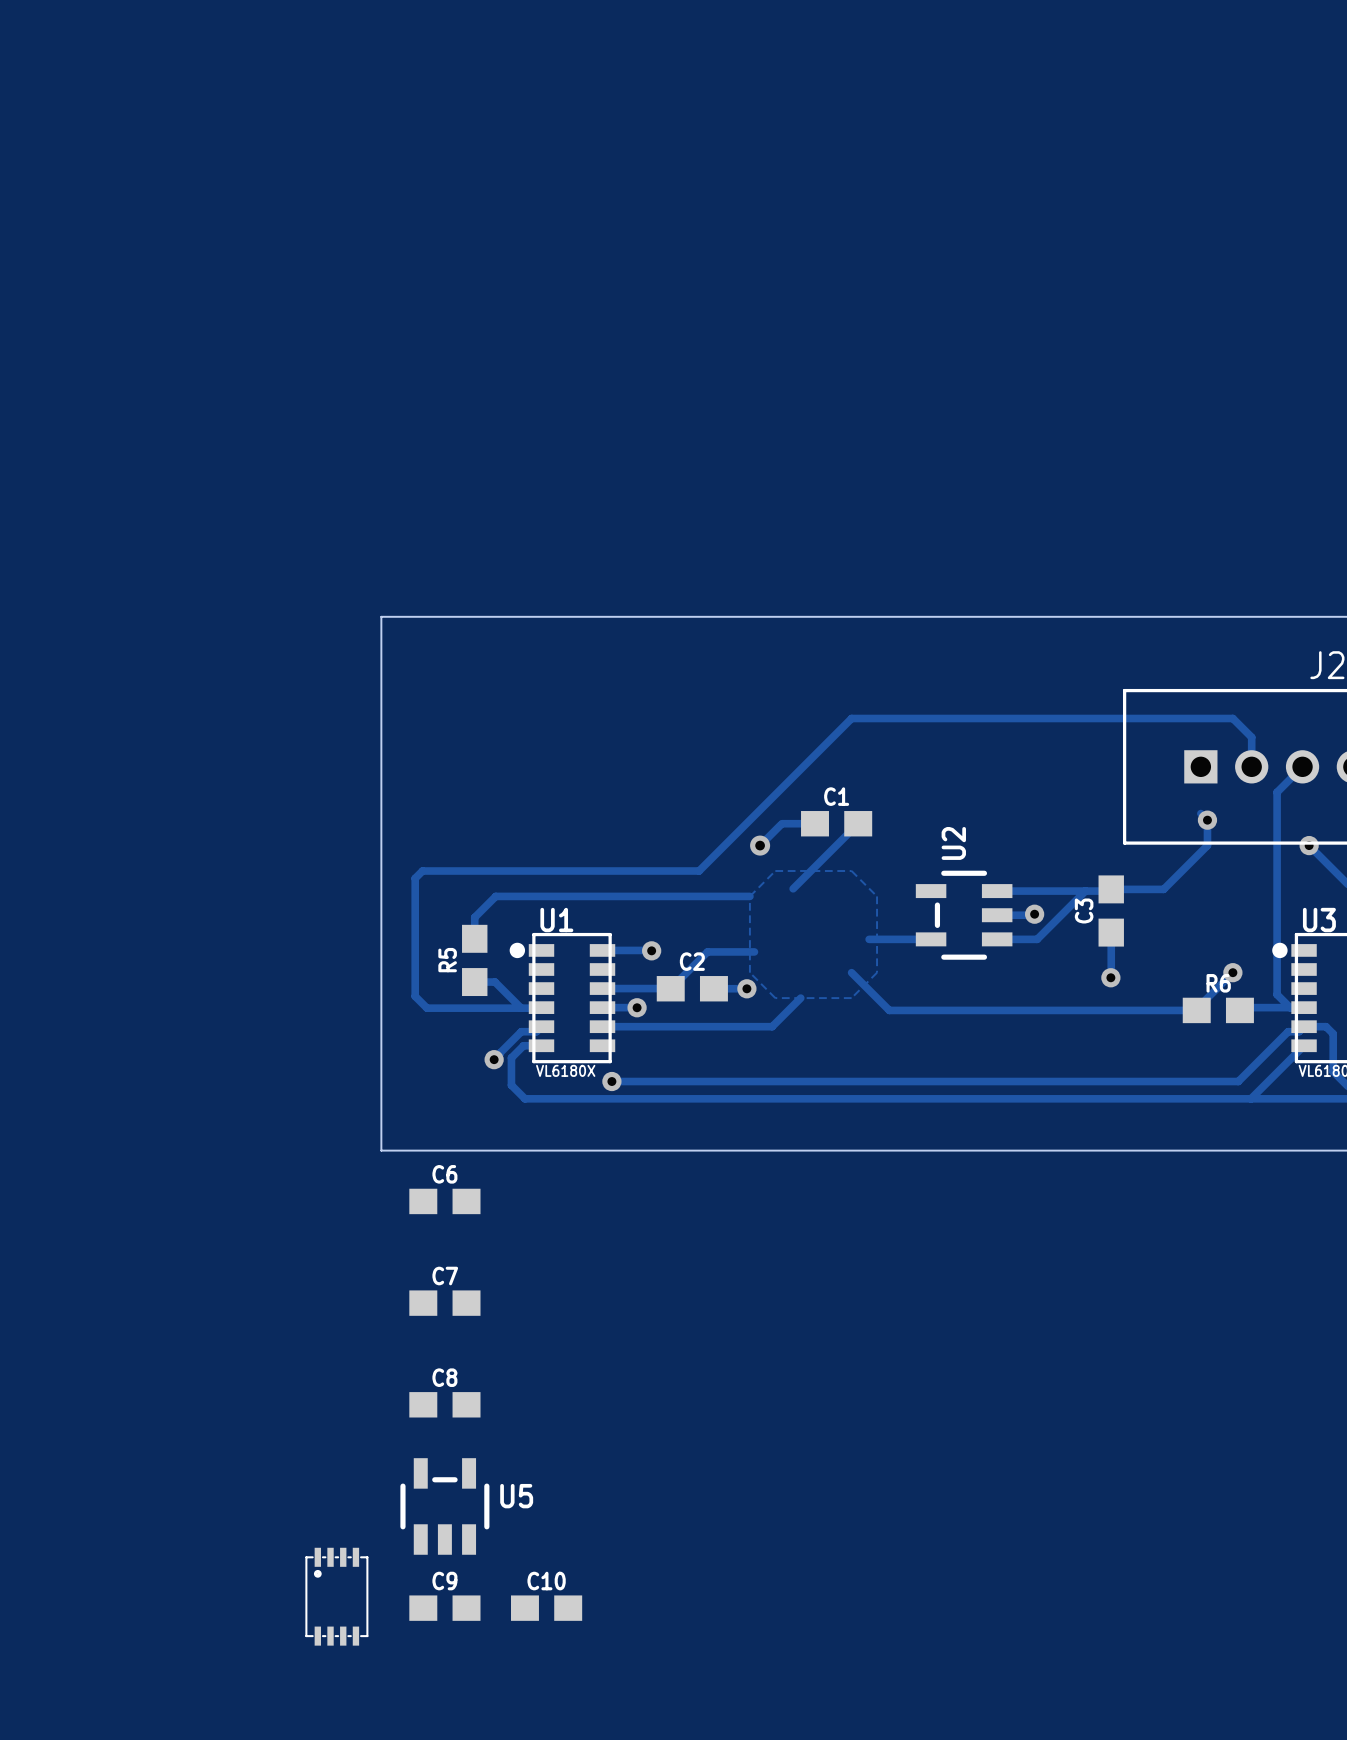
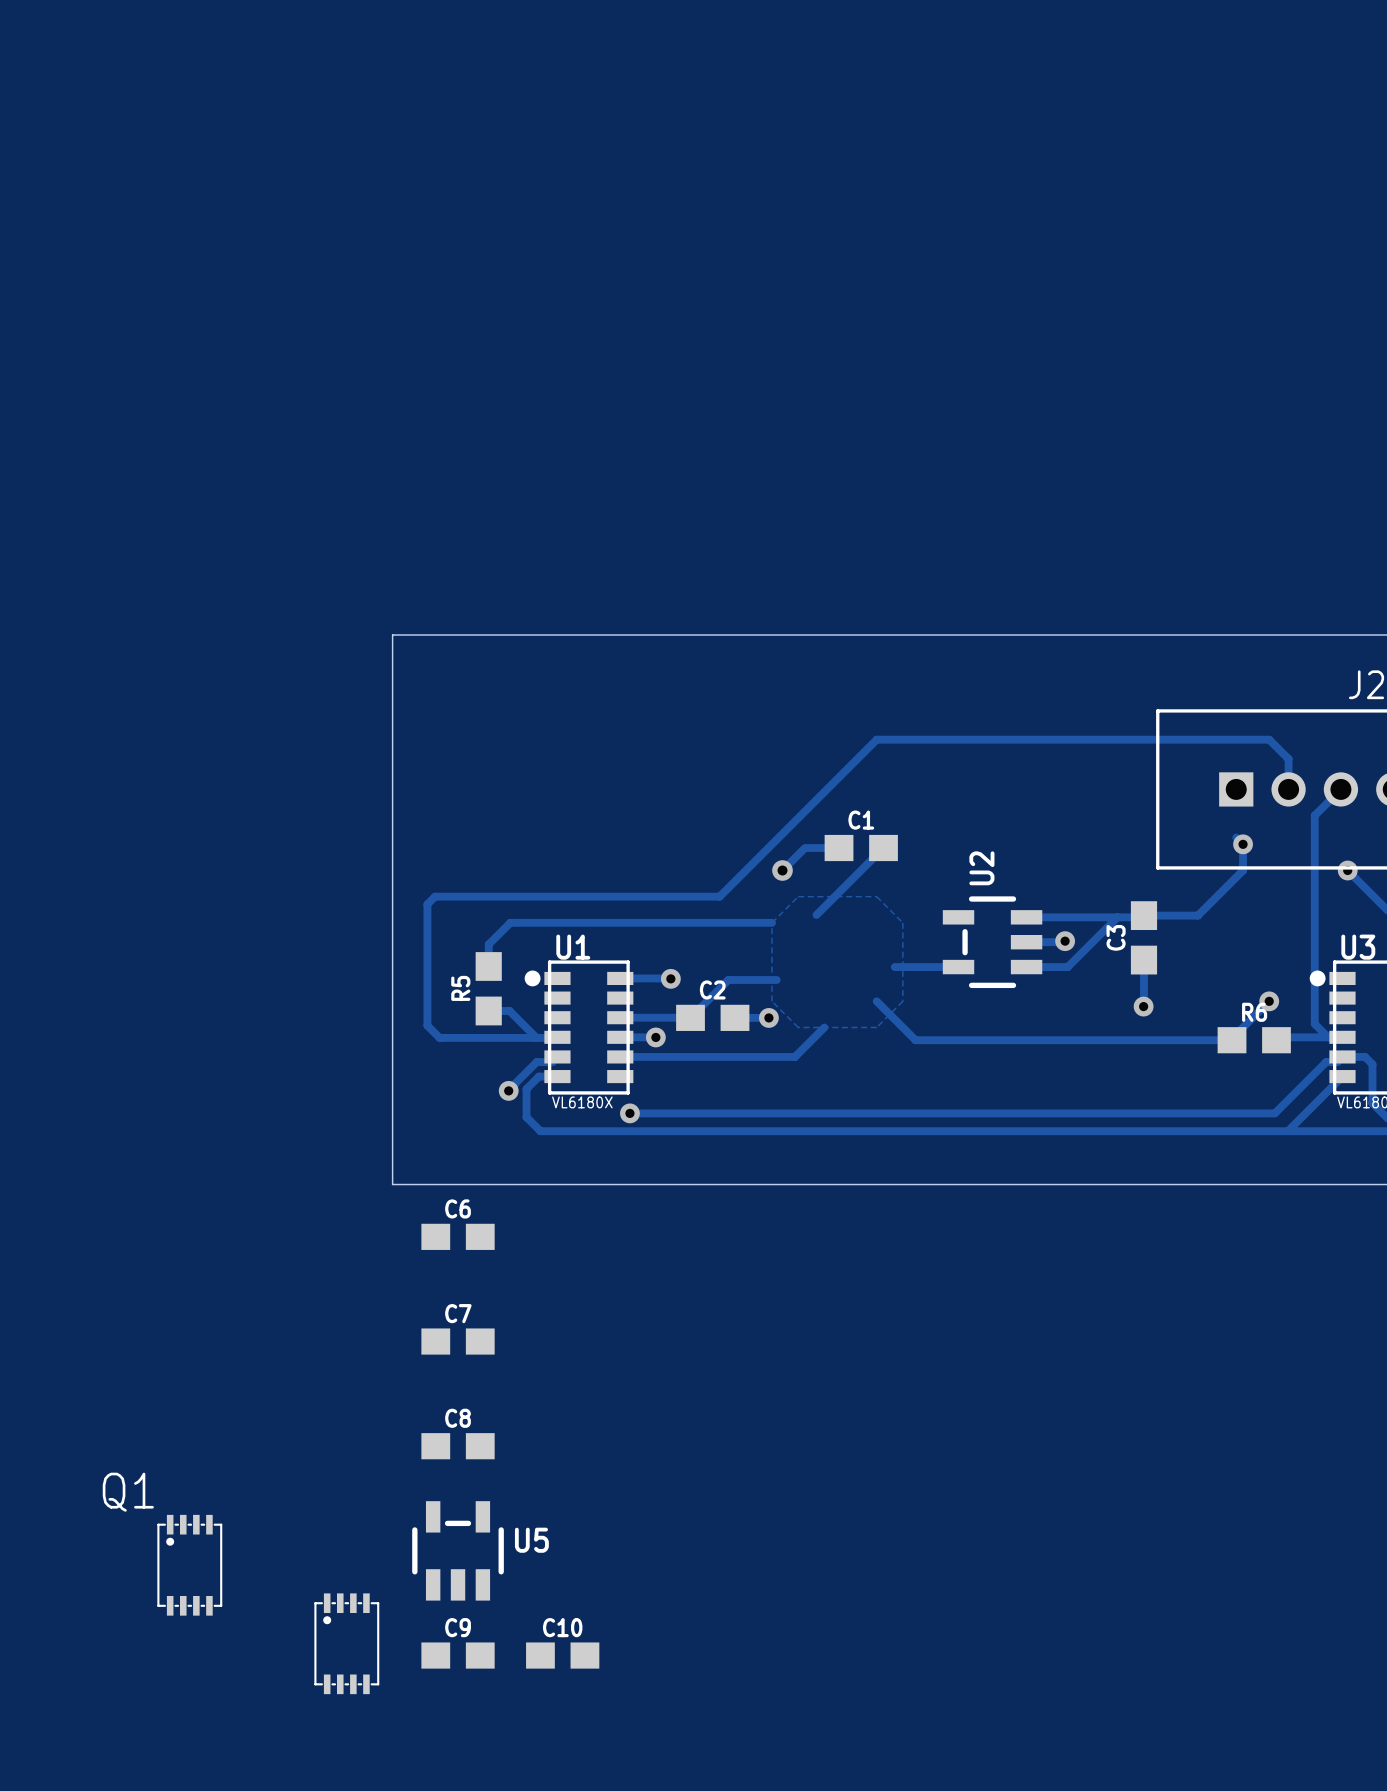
Q1: none -> (189, 1565)

